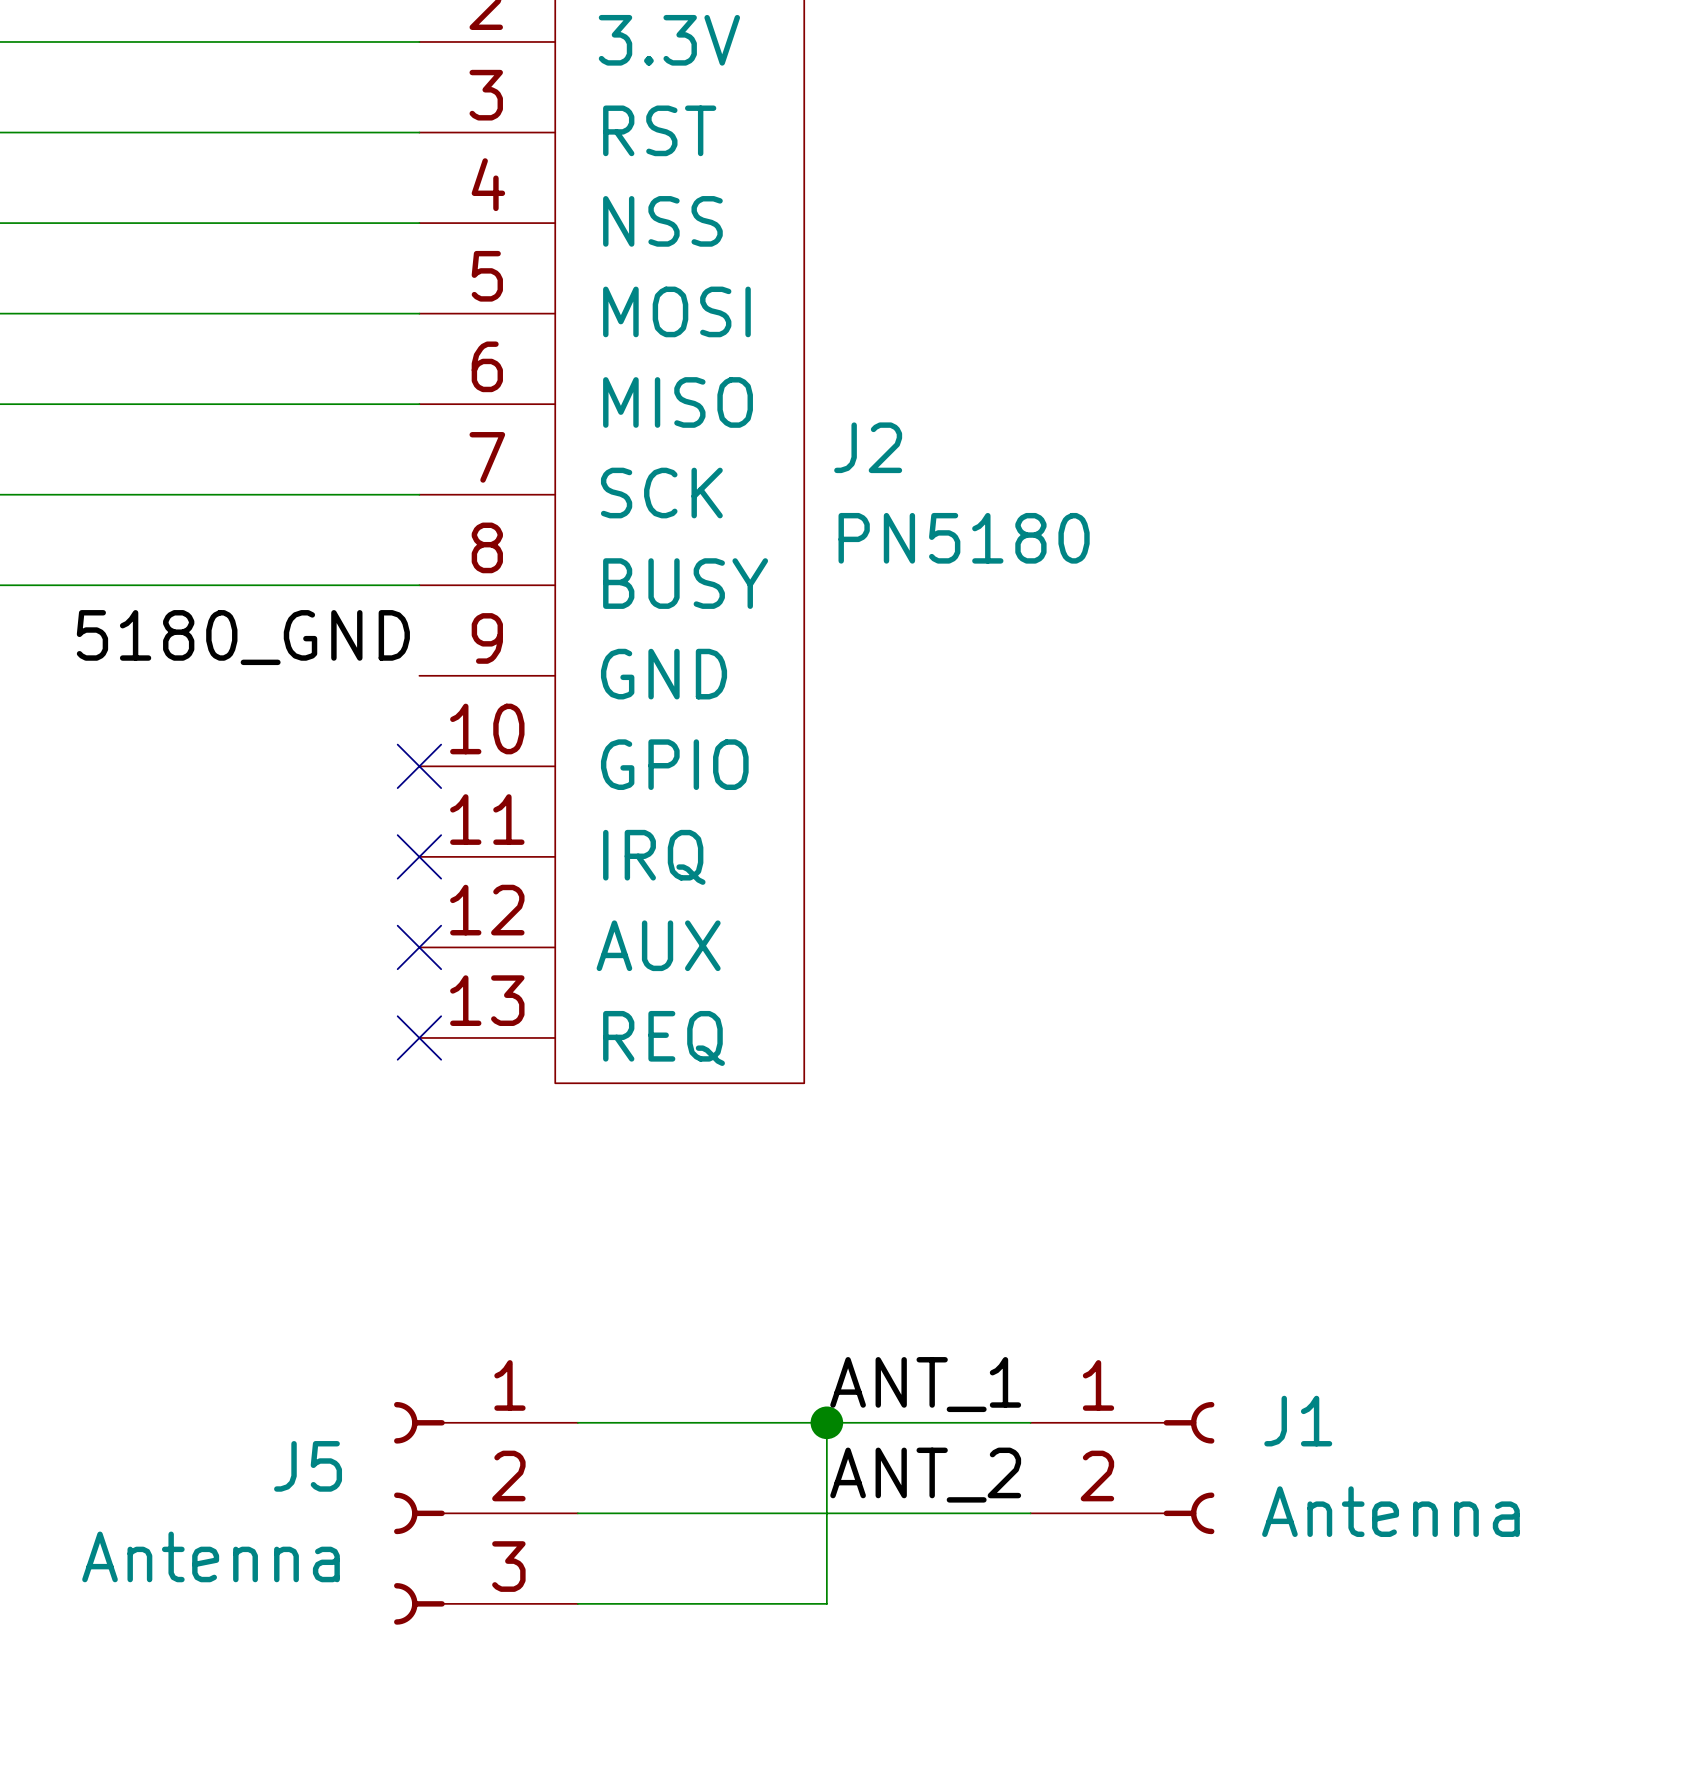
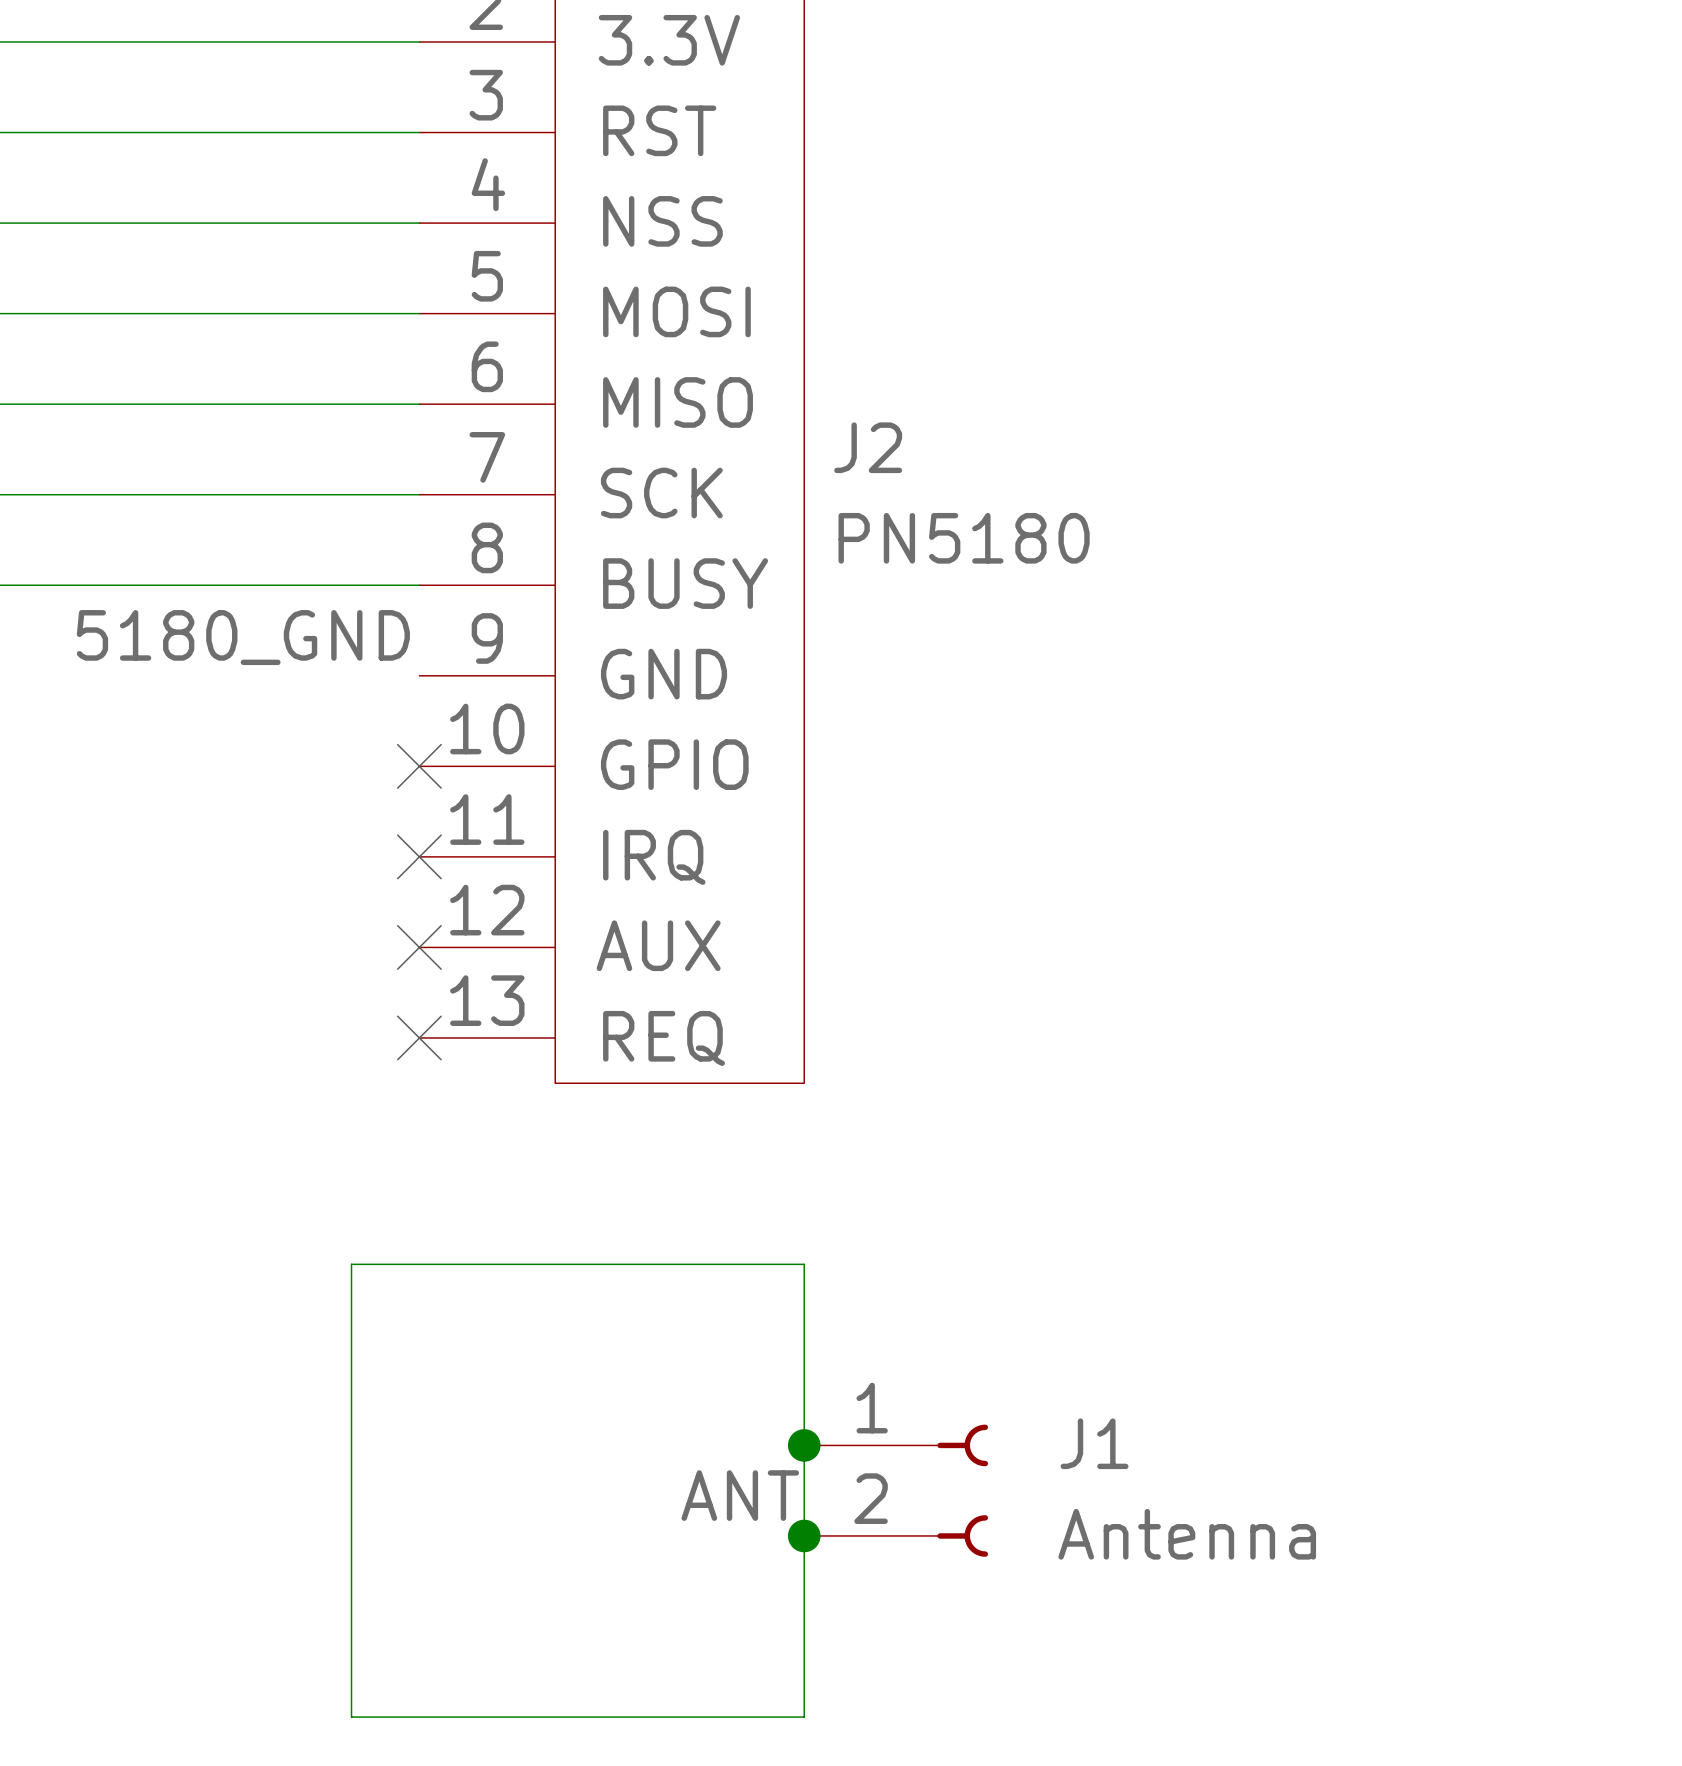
wire: none -> (351, 1264) (804, 1264) (804, 1717) (351, 1717) (351, 1264)
label: ANT_1 (925, 1384) -> none
J1 name position: J1 (1298, 1421) -> J1 (1094, 1443)
wire: (577, 1422) (1030, 1422) -> none
wire: (826, 1422) (826, 1603) (577, 1603) -> none
junction position: (826, 1422) -> (804, 1445)
J1 position: (1122, 1468) -> (896, 1490)
label: ANT_2 (925, 1475) -> ANT (740, 1495)
J1 value position: Antenna (1390, 1511) -> Antenna (1187, 1534)
J5: Antenna (485, 1513) -> none
wire: (577, 1513) (1030, 1513) -> none
junction: none -> (804, 1535)

